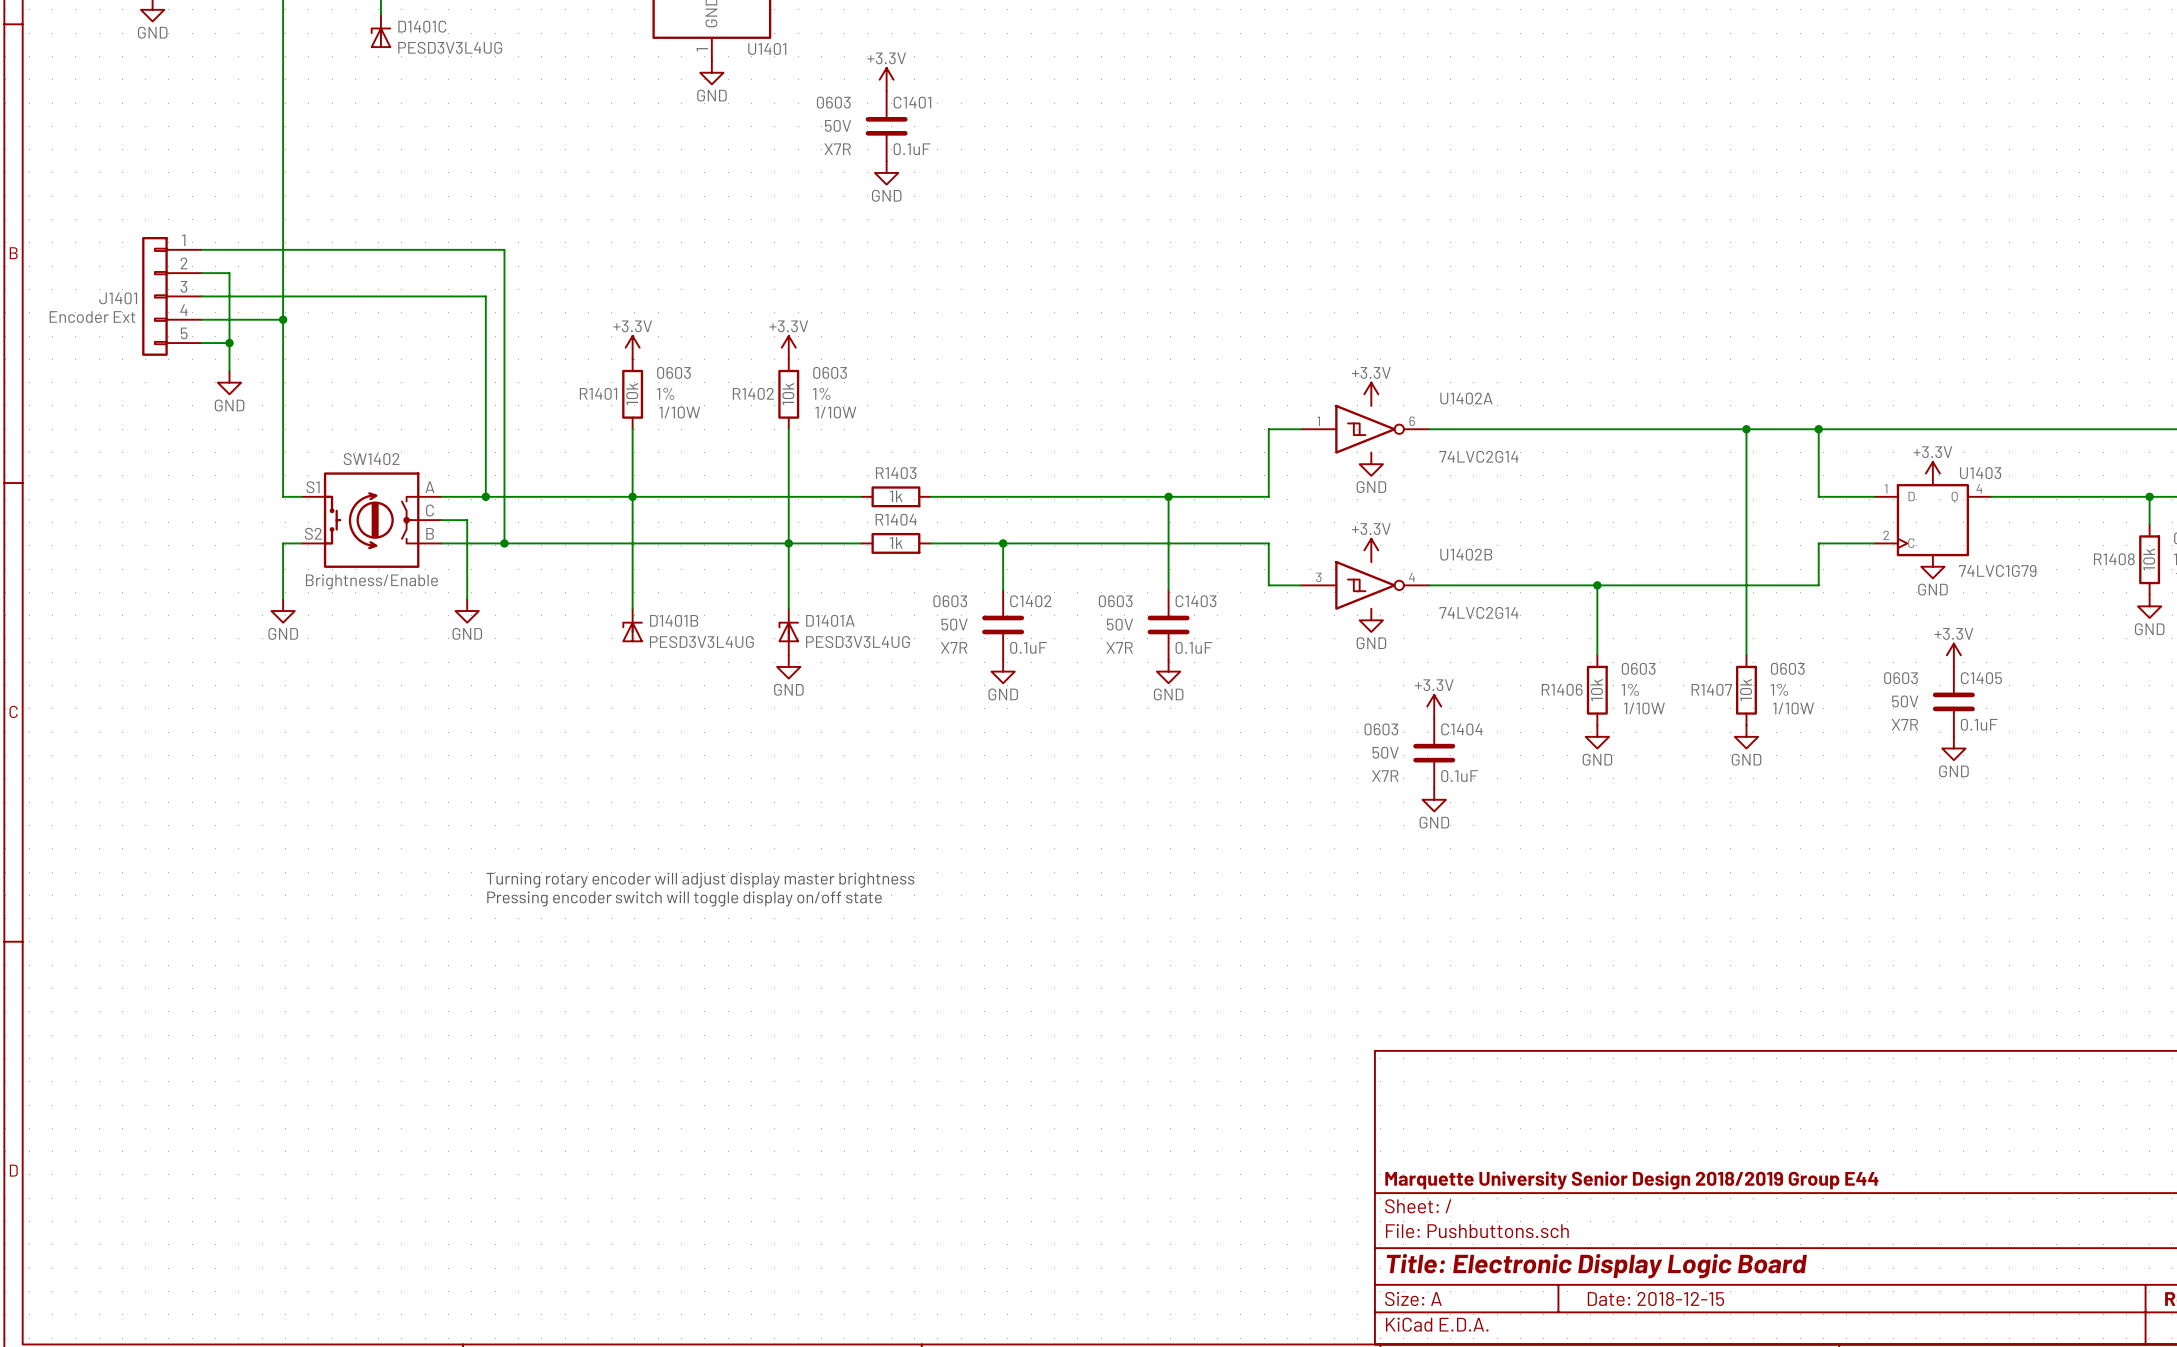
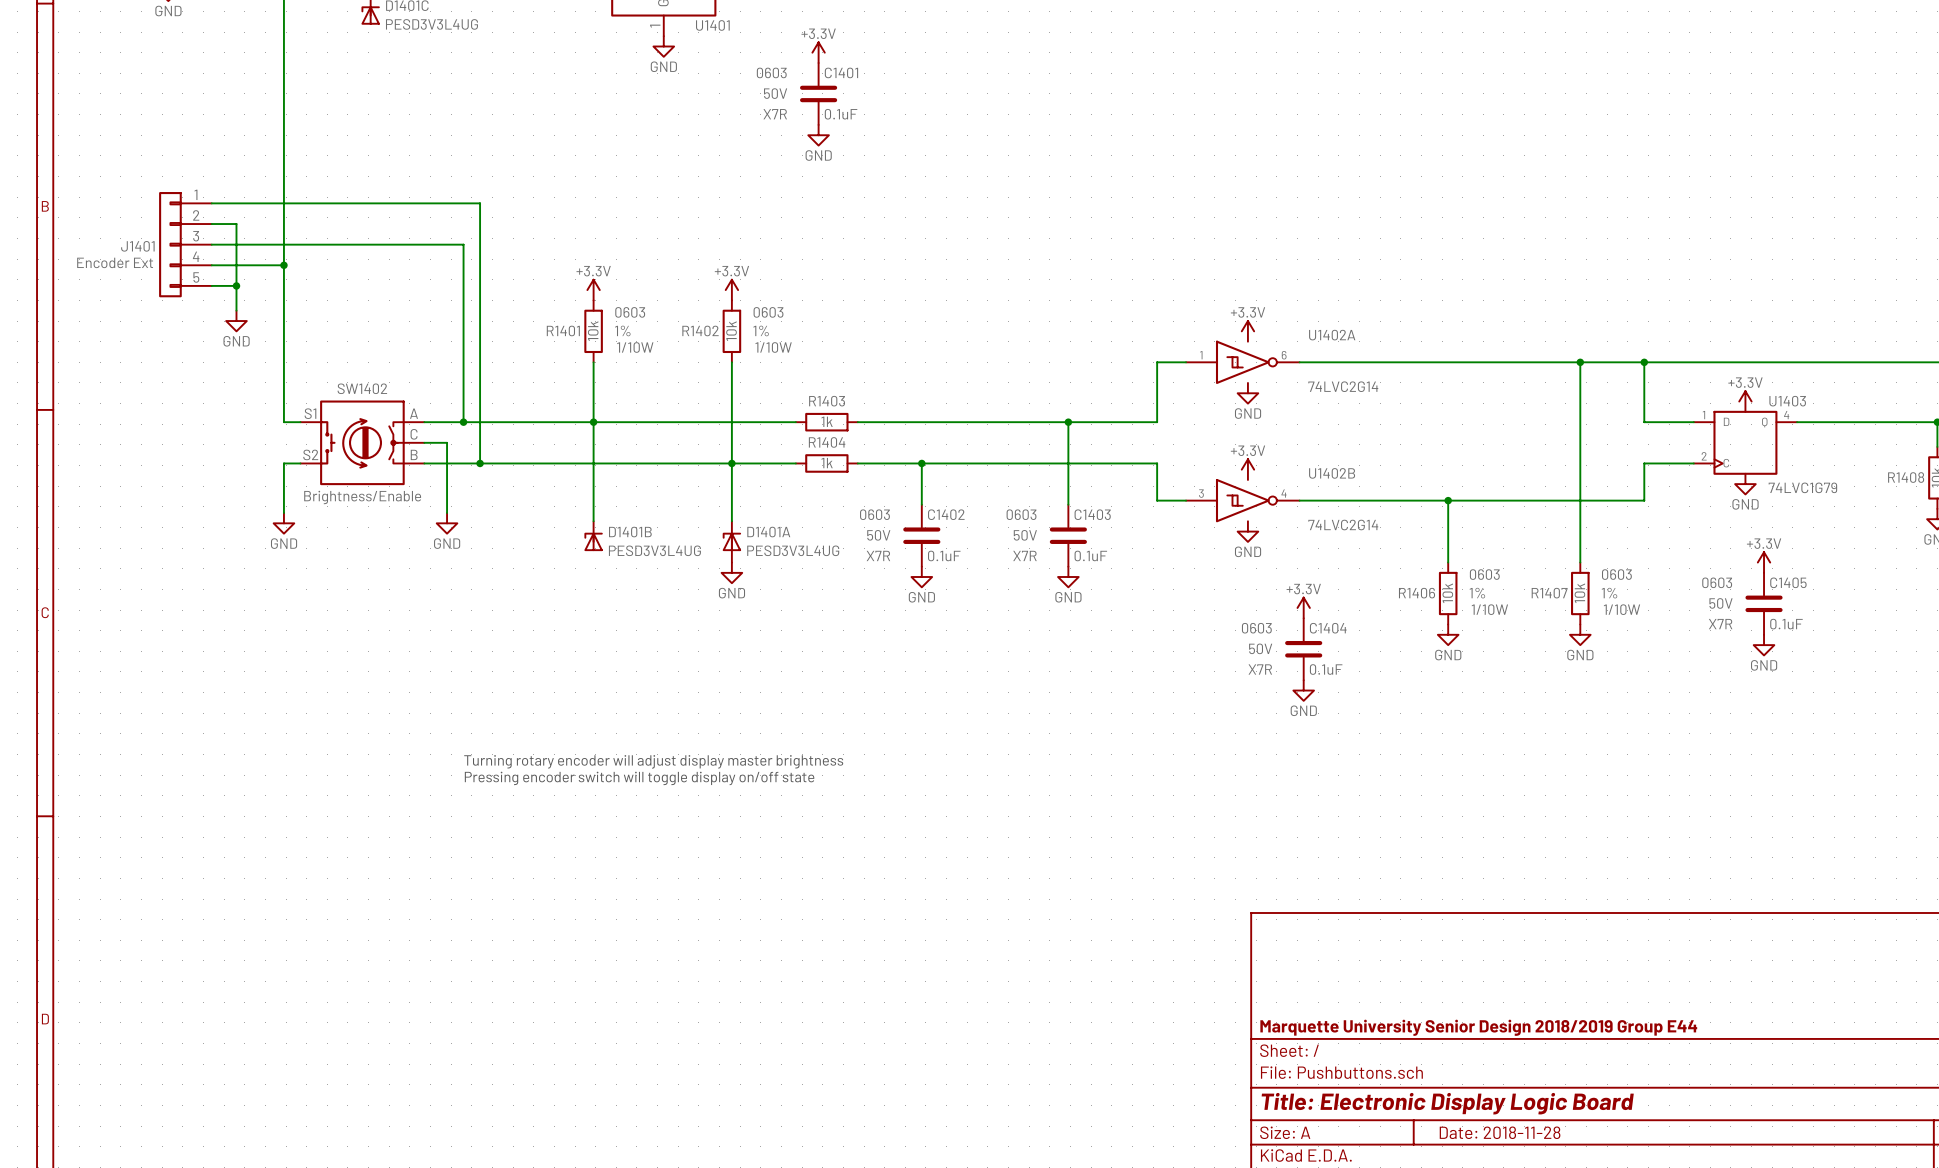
title block: Date: 2018-12-15 (1655, 1299) -> Date: 2018-11-28 (1500, 1132)

